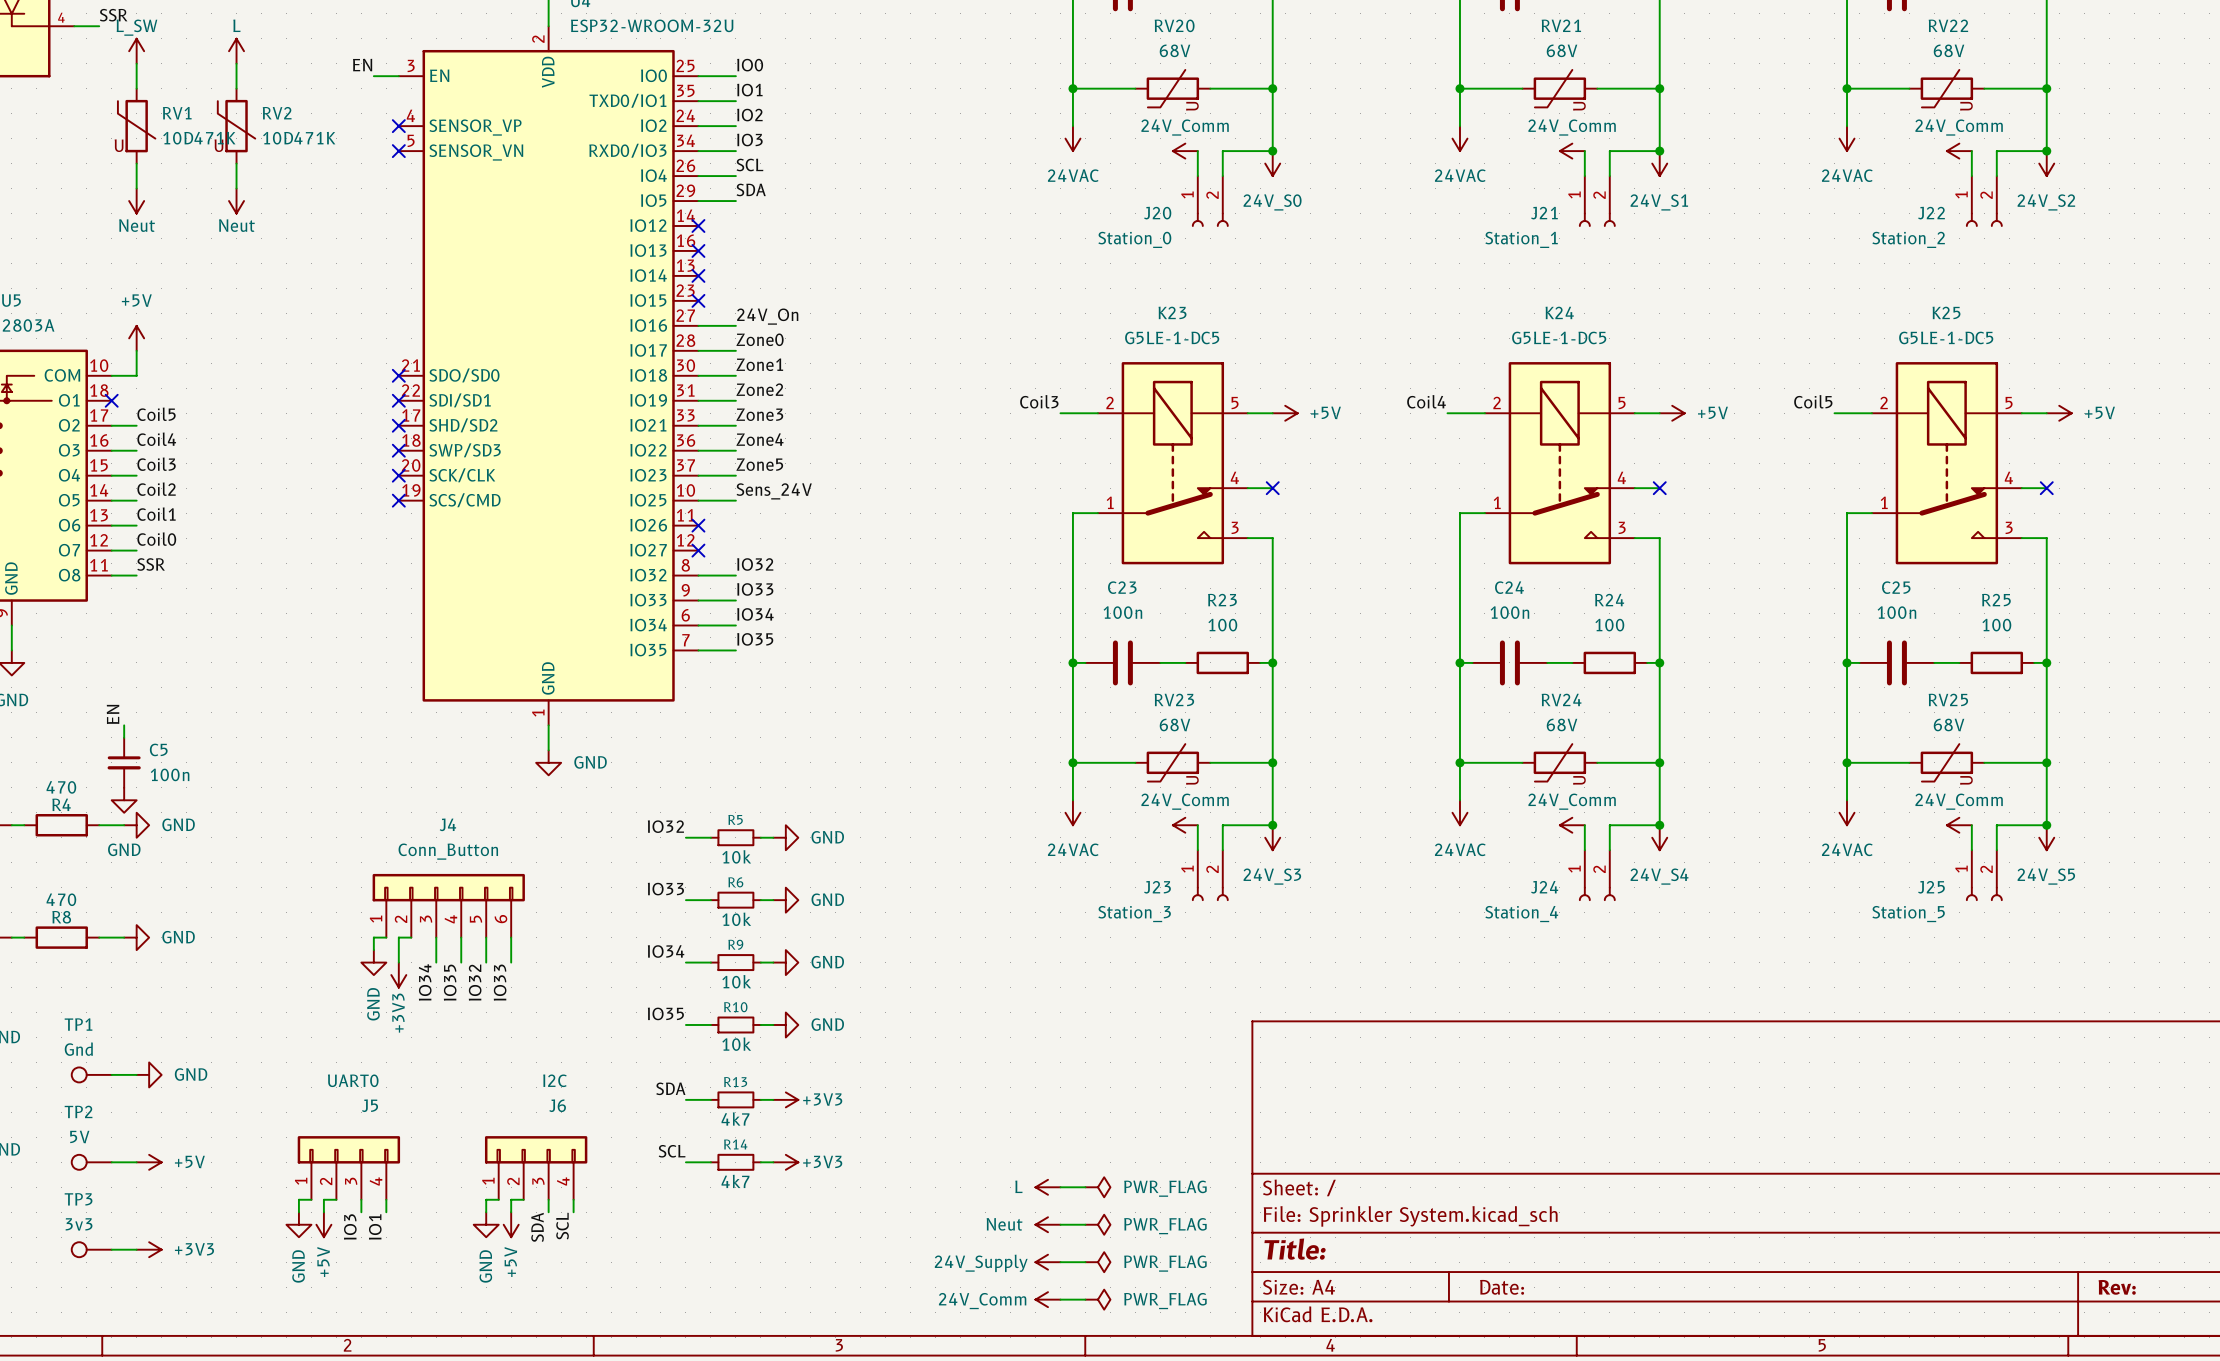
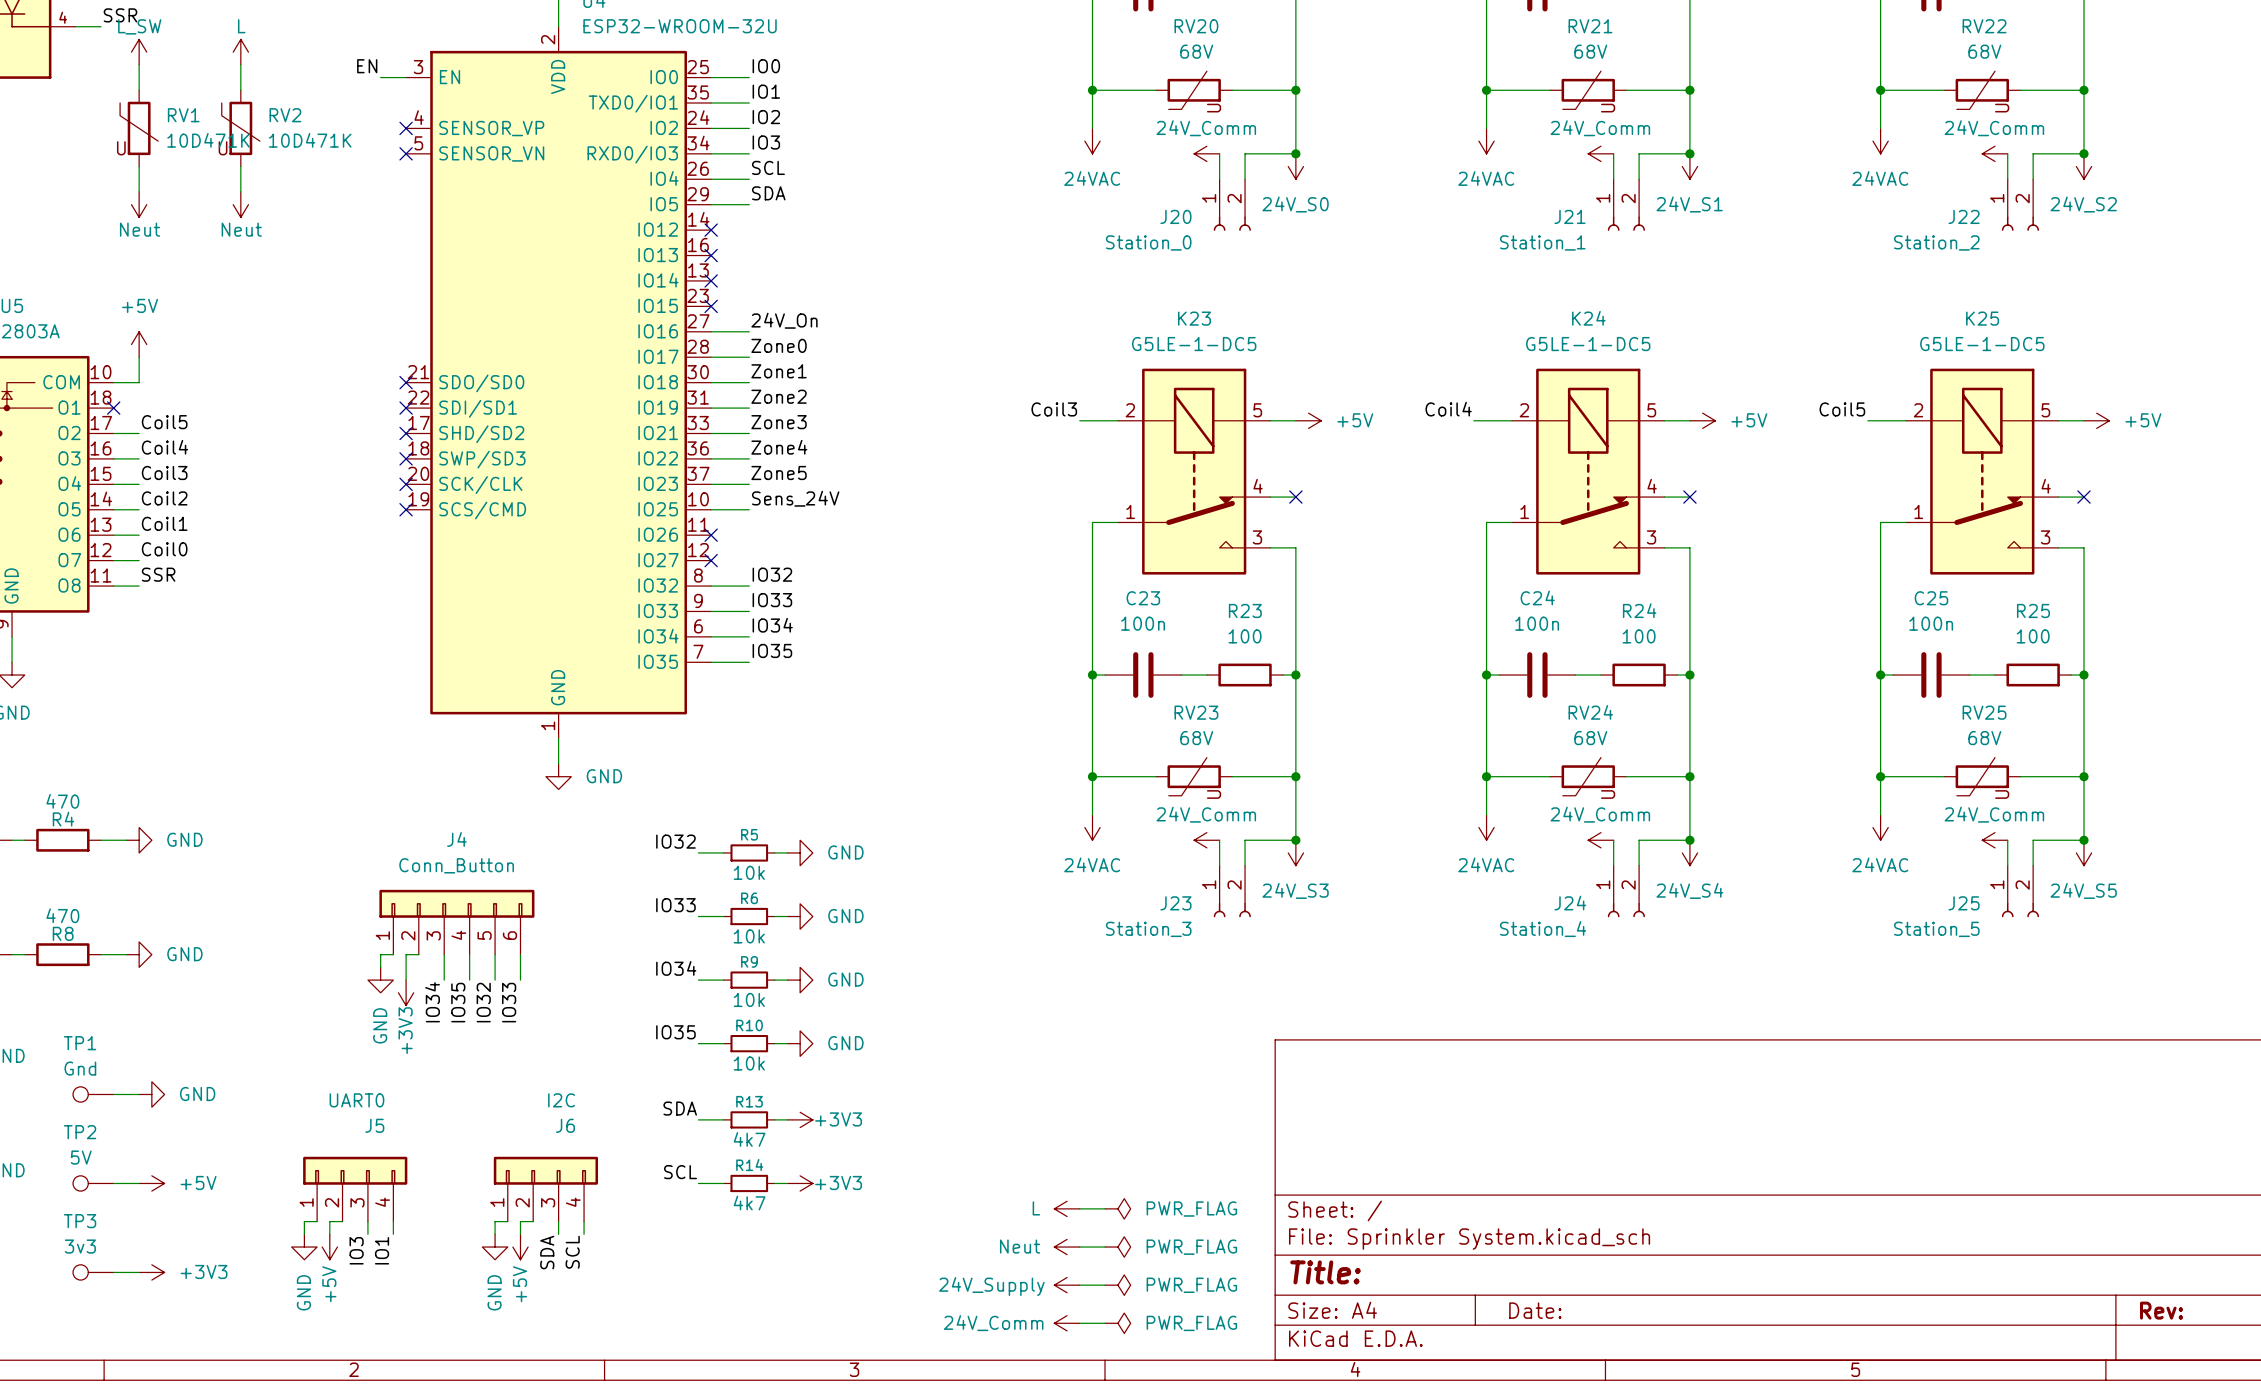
label: EN (113, 714) -> none
wire: (124, 725) (124, 737) -> none
C5: 100n (124, 762) -> none
power symbol: GND (124, 800) -> none

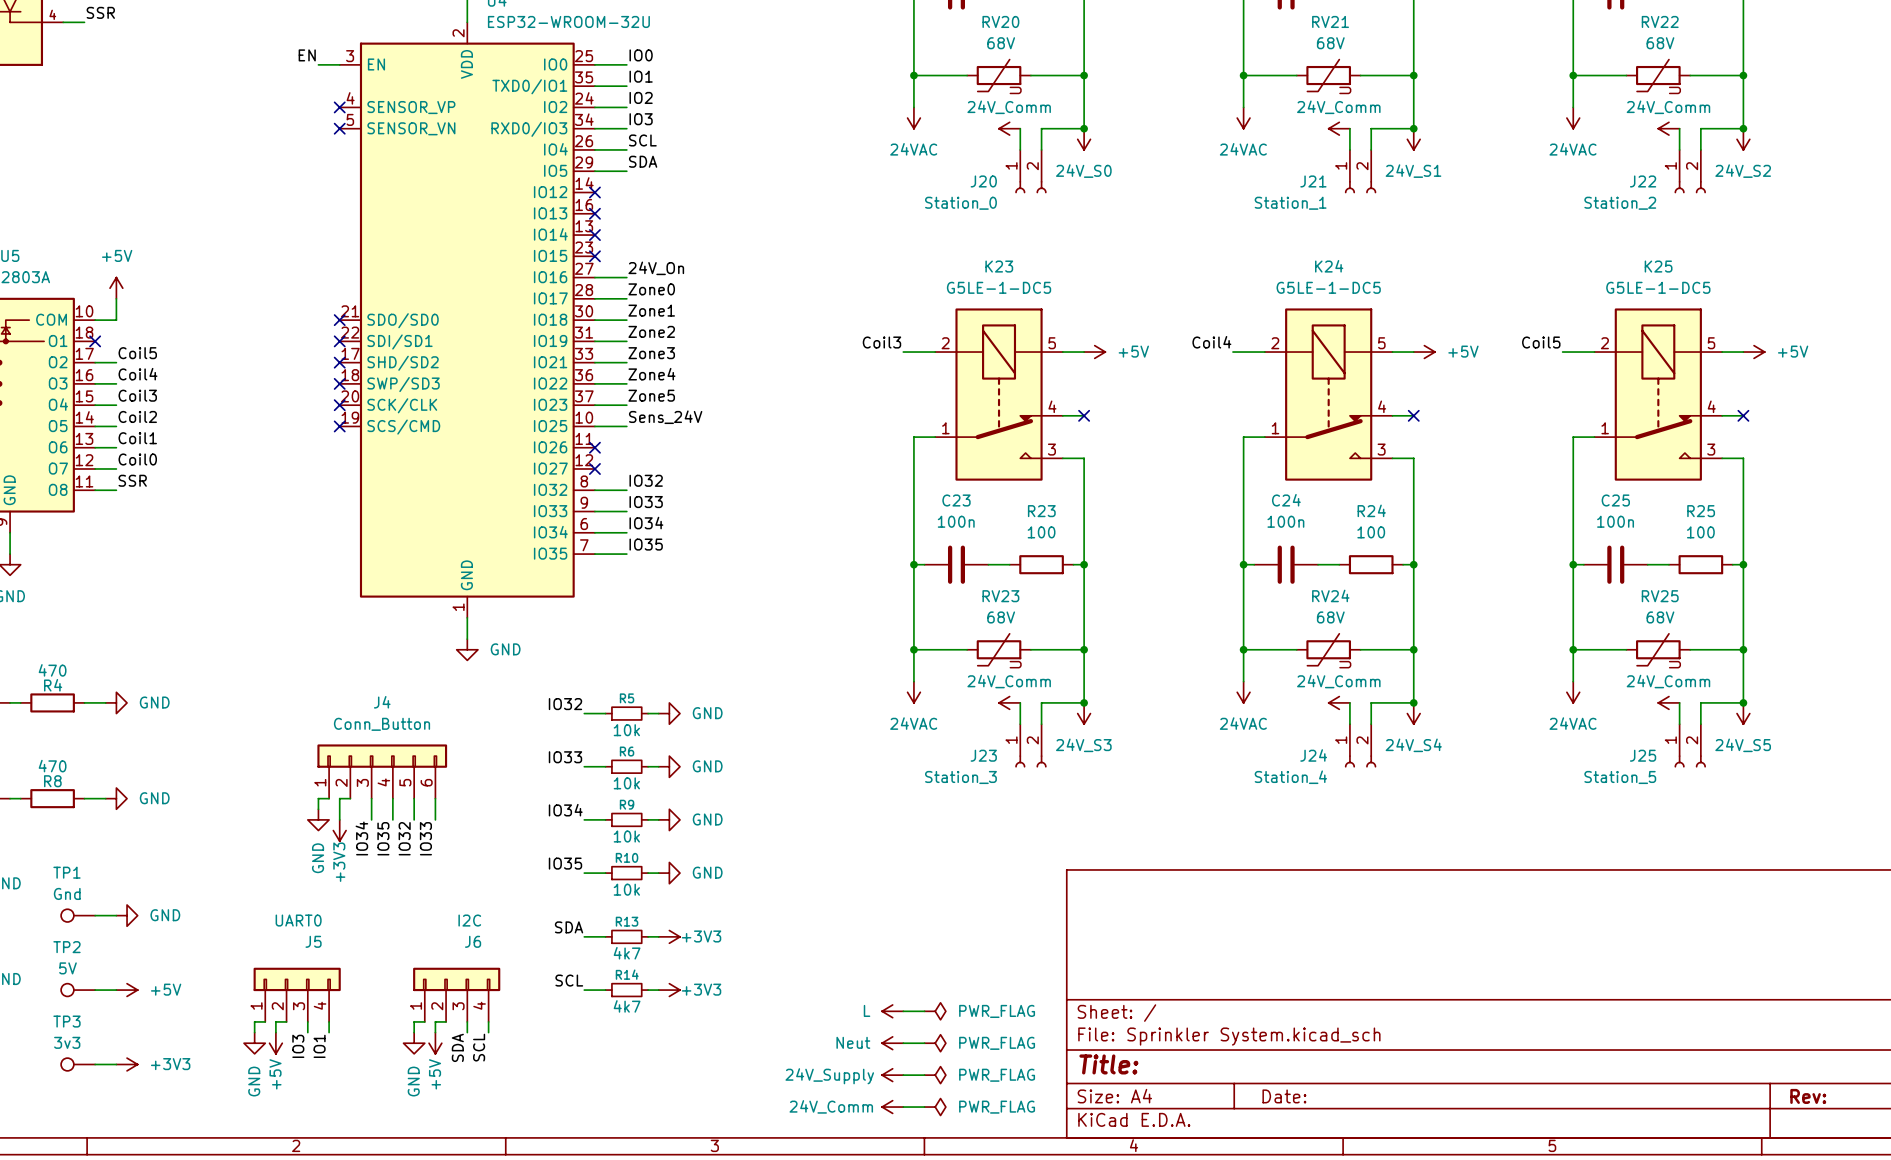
power symbol: L_SW (139, 52) -> none
power symbol: L (240, 52) -> none
wire: (139, 64) (139, 90) -> none
wire: (240, 64) (240, 90) -> none
RV1: 10D471K (139, 128) -> none
RV2: 10D471K (240, 128) -> none
wire: (139, 166) (139, 191) -> none
wire: (240, 166) (240, 191) -> none
power symbol: Neut (139, 204) -> none
power symbol: Neut (240, 204) -> none

